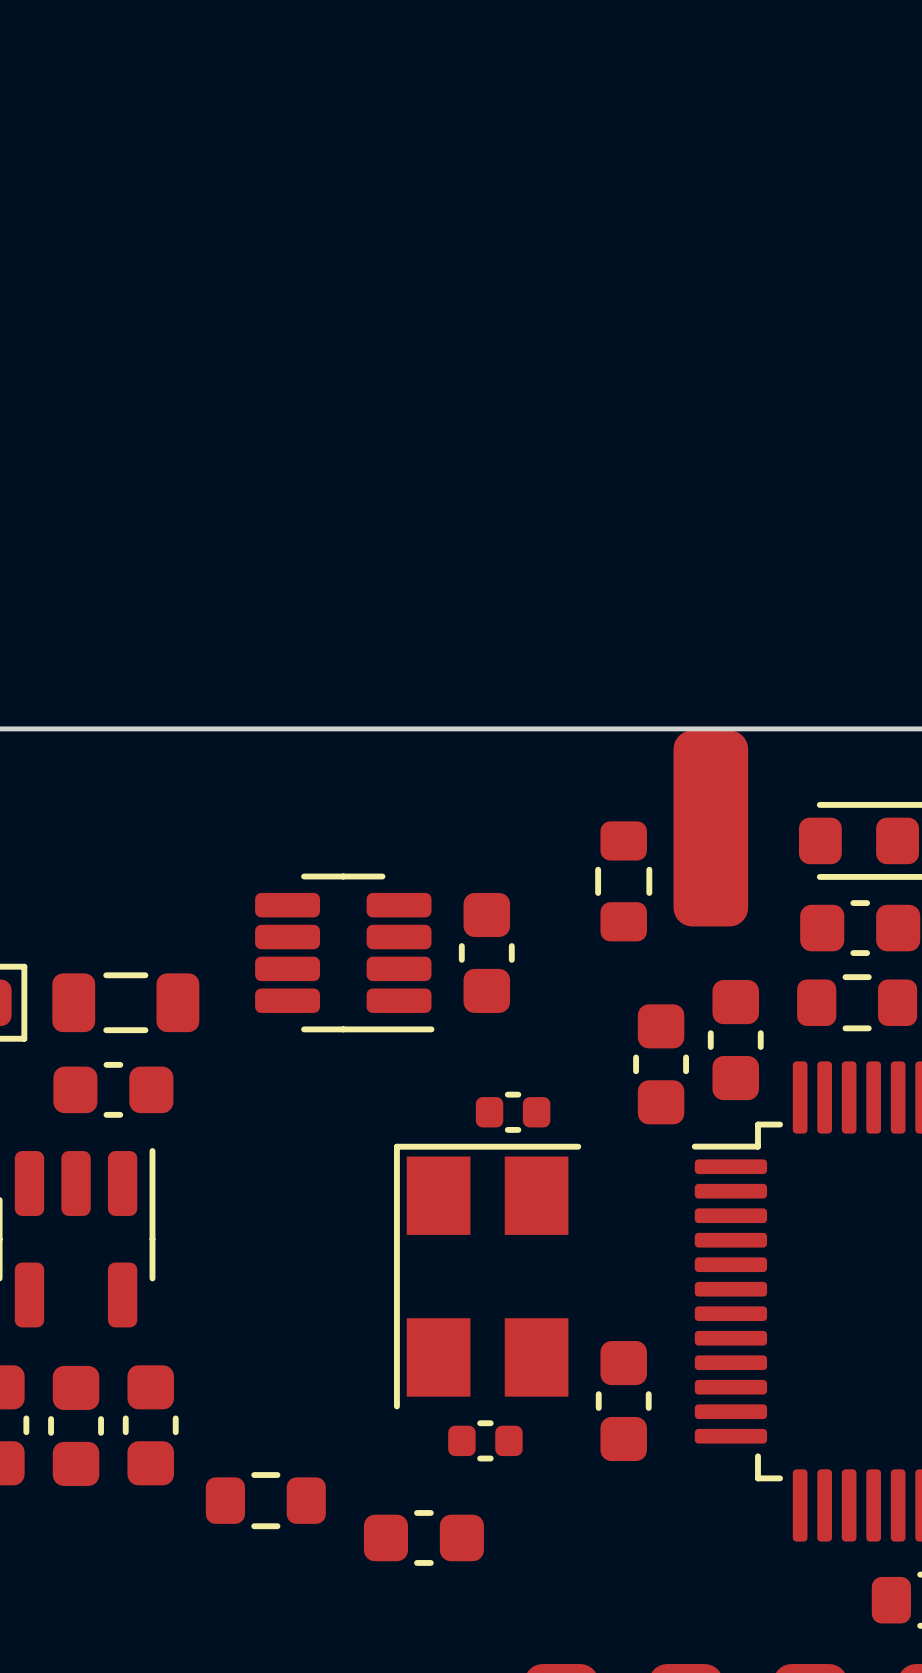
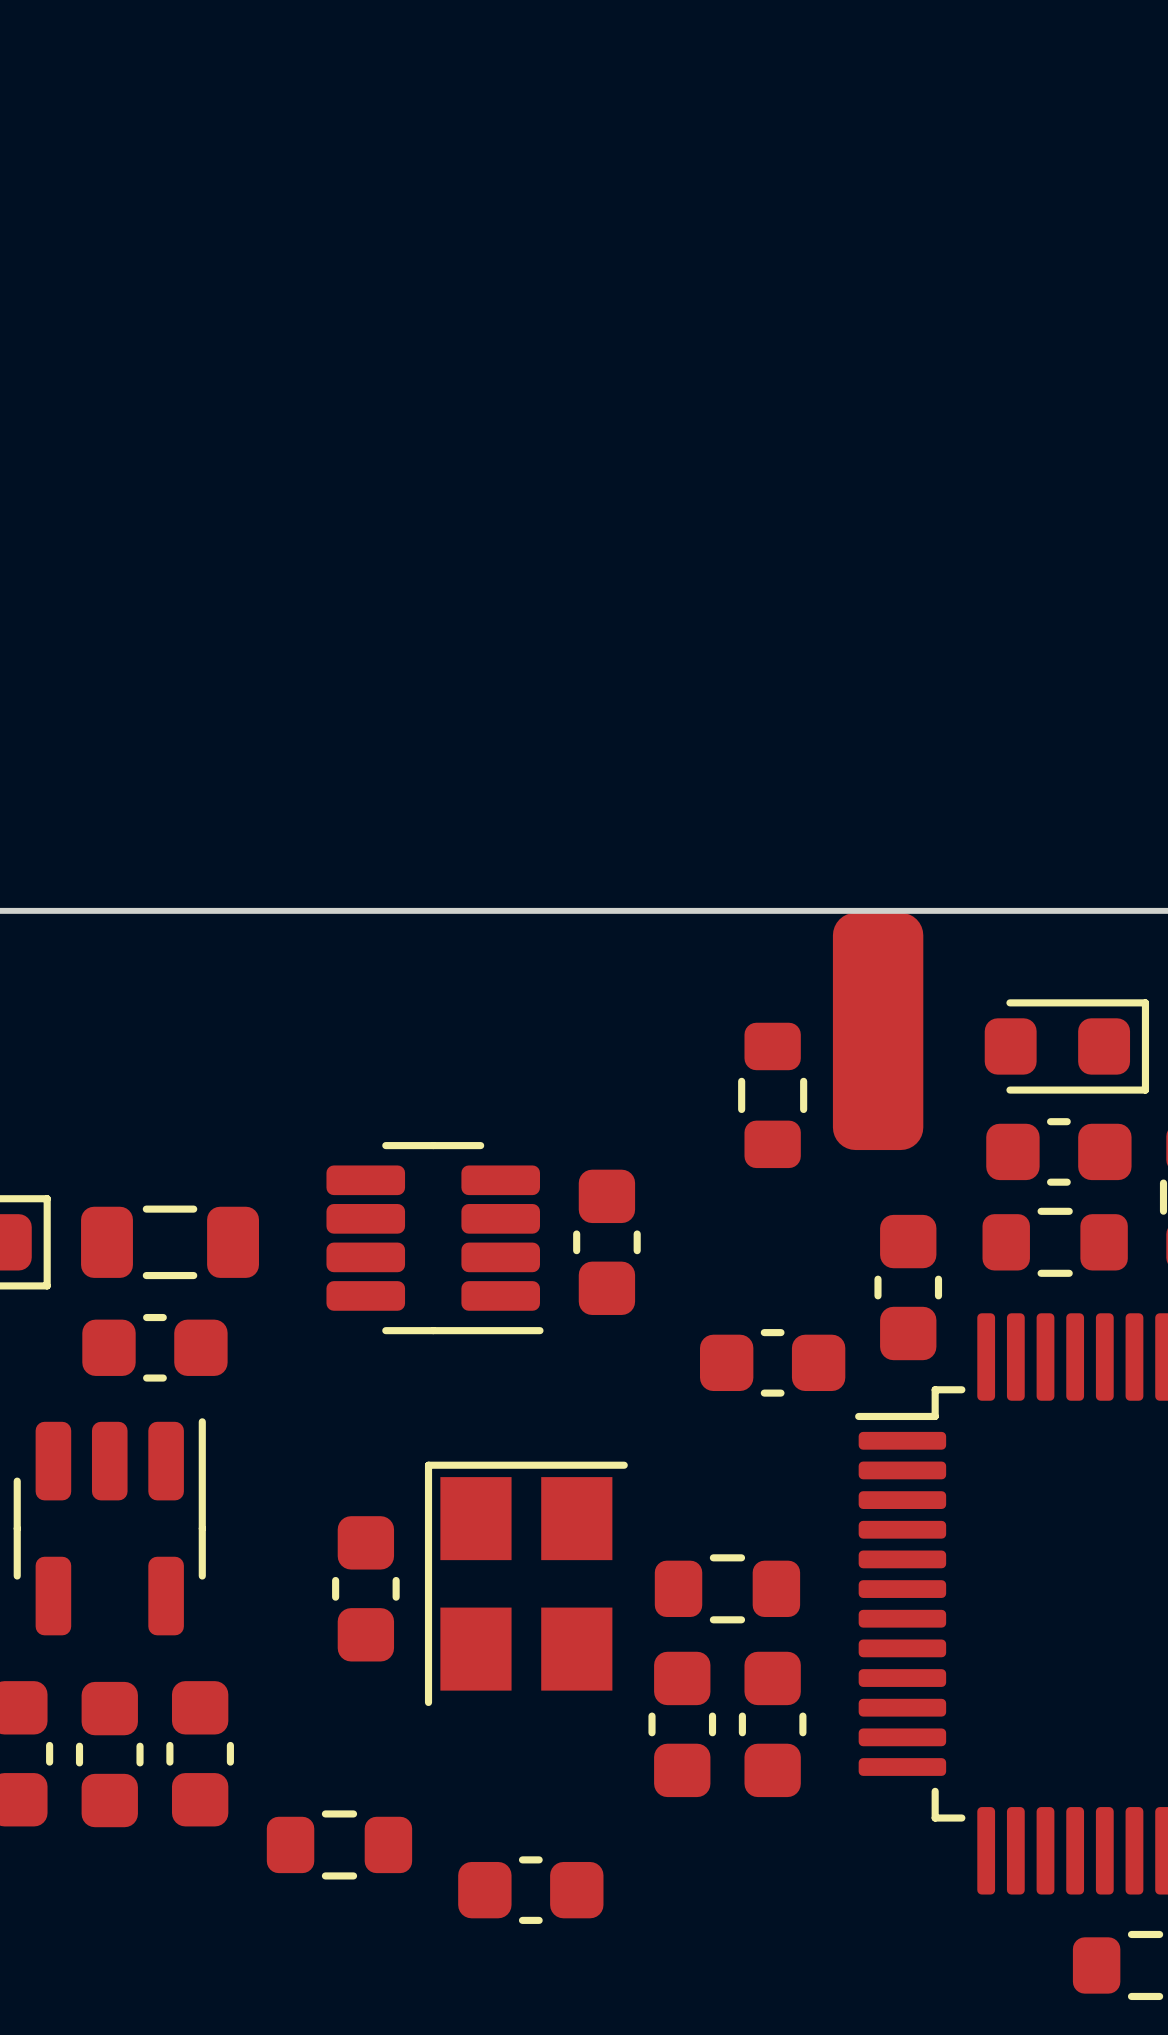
part position: (344, 952) -> (435, 1238)
part position: (486, 952) -> (606, 1242)
part rotation: 0° (661, 1064) -> 90° clockwise (772, 1362)
part: (513, 1112) -> none
part: (487, 1276) -> none
part: none -> (526, 1583)
part: none -> (365, 1588)
part: none -> (727, 1588)
part: none -> (682, 1724)
part: (485, 1440) -> none

